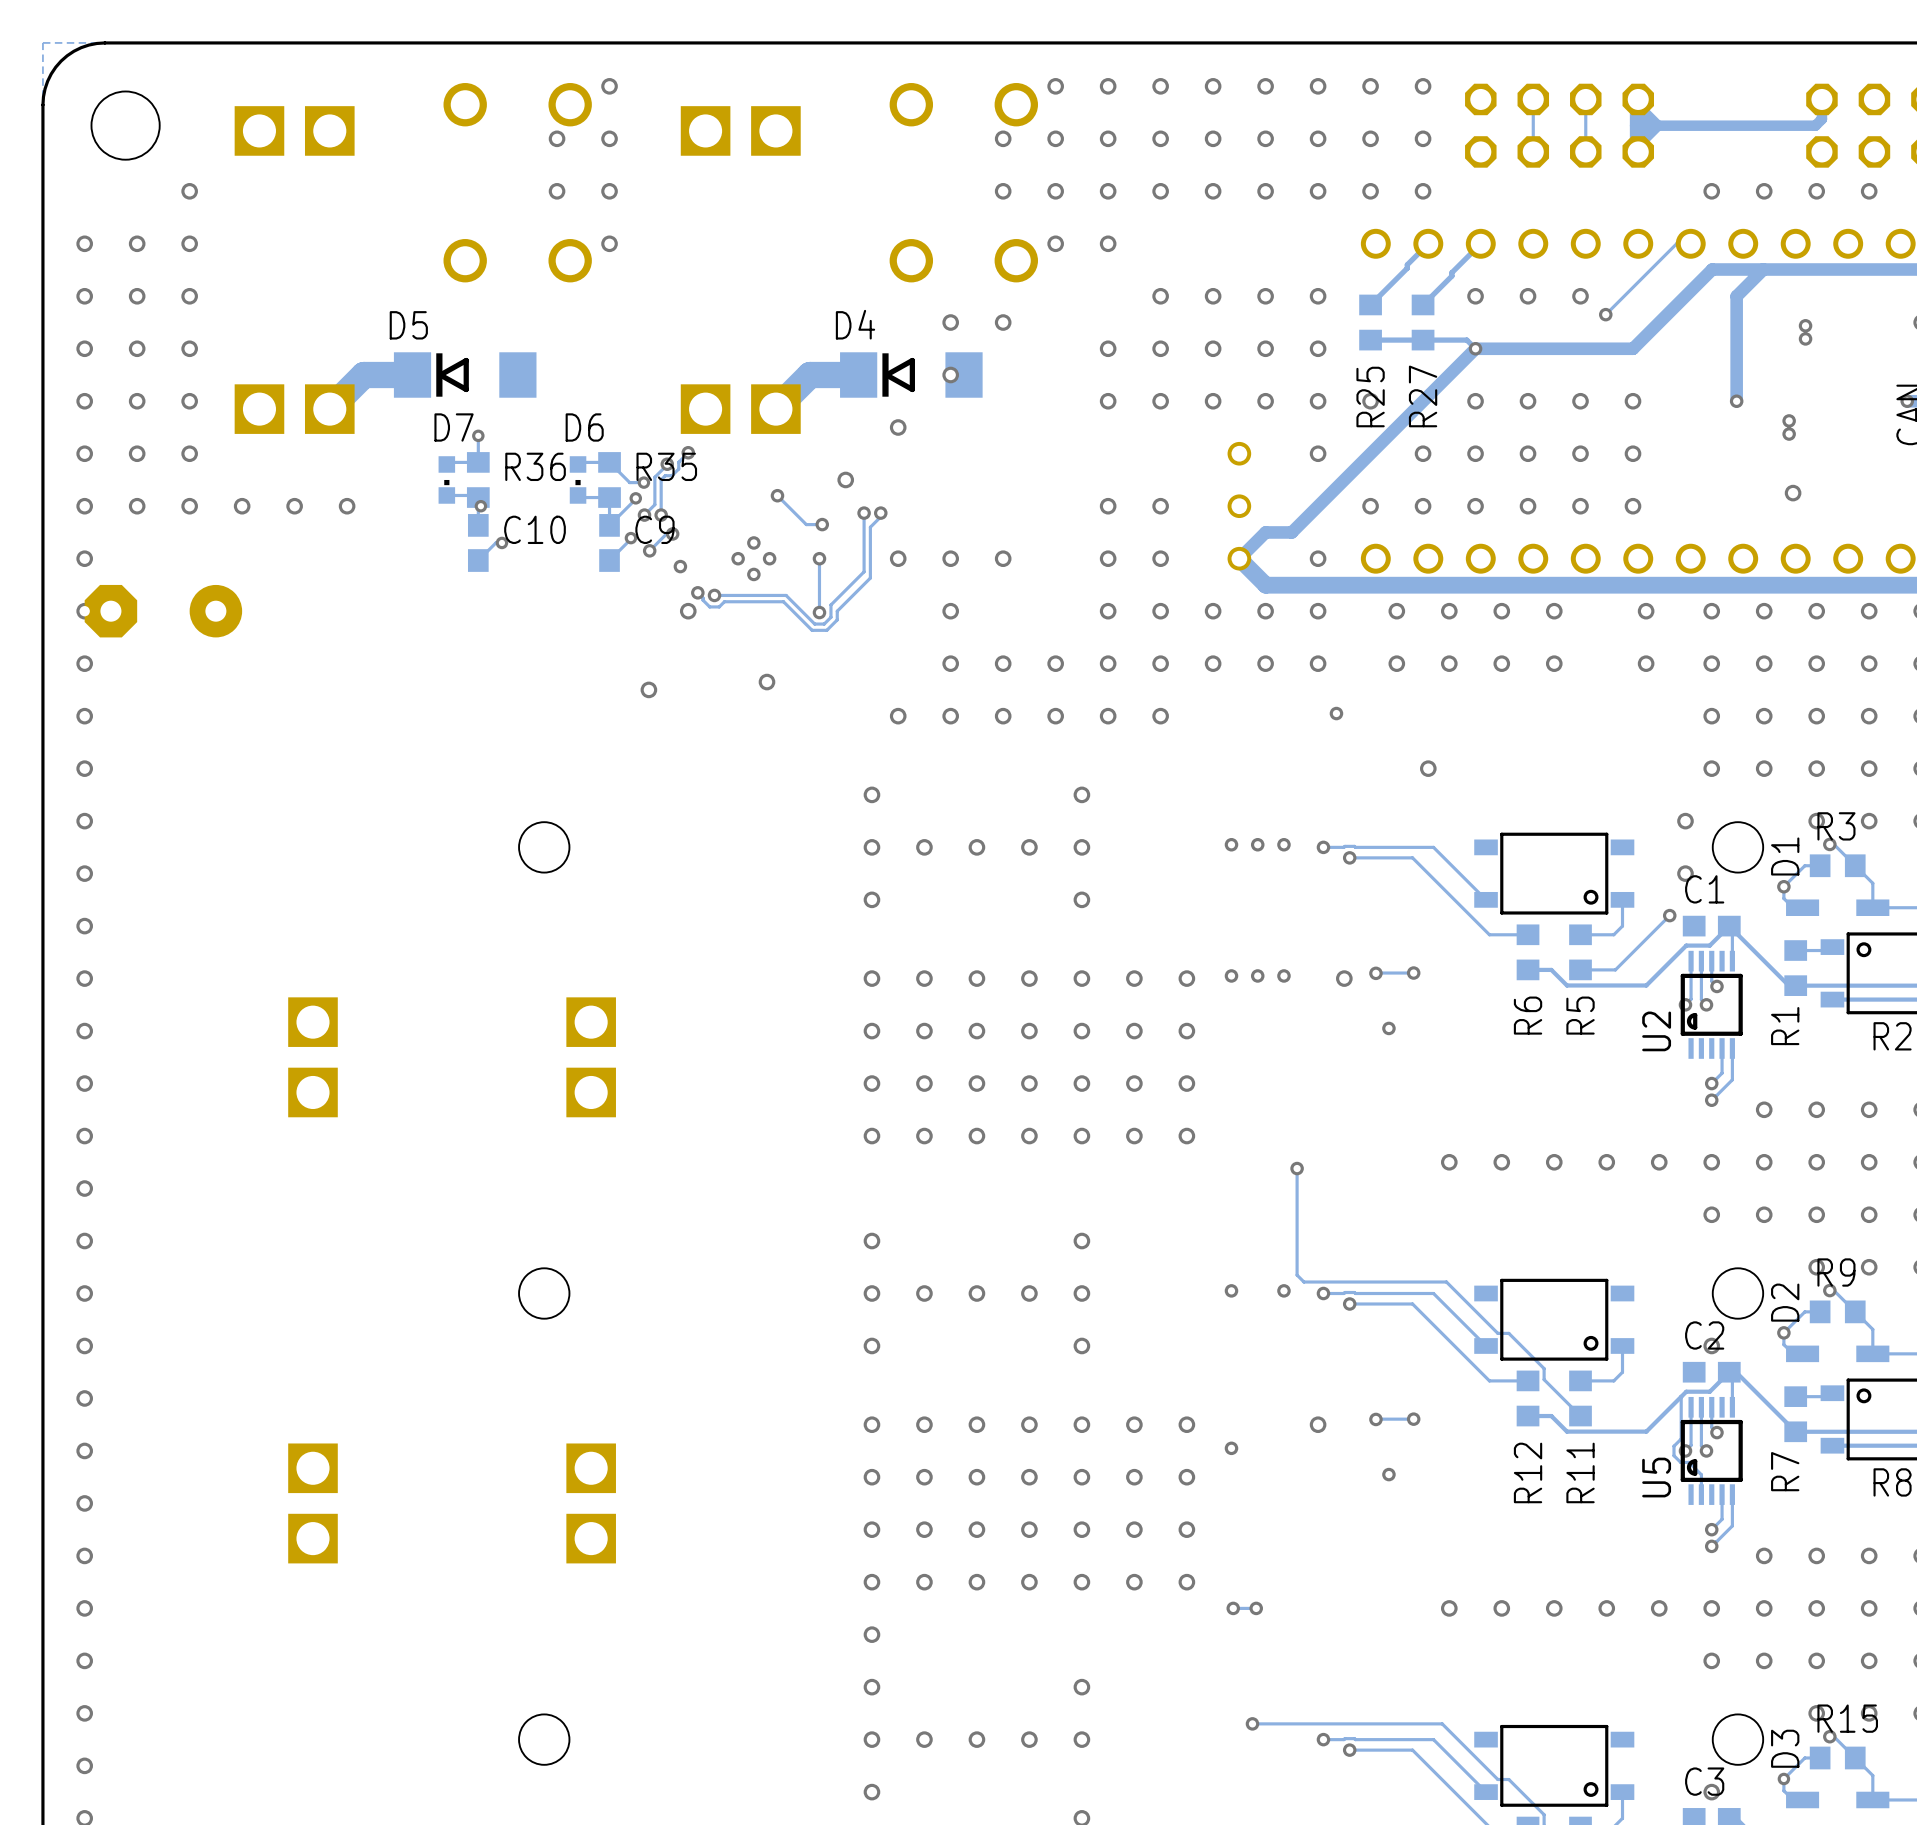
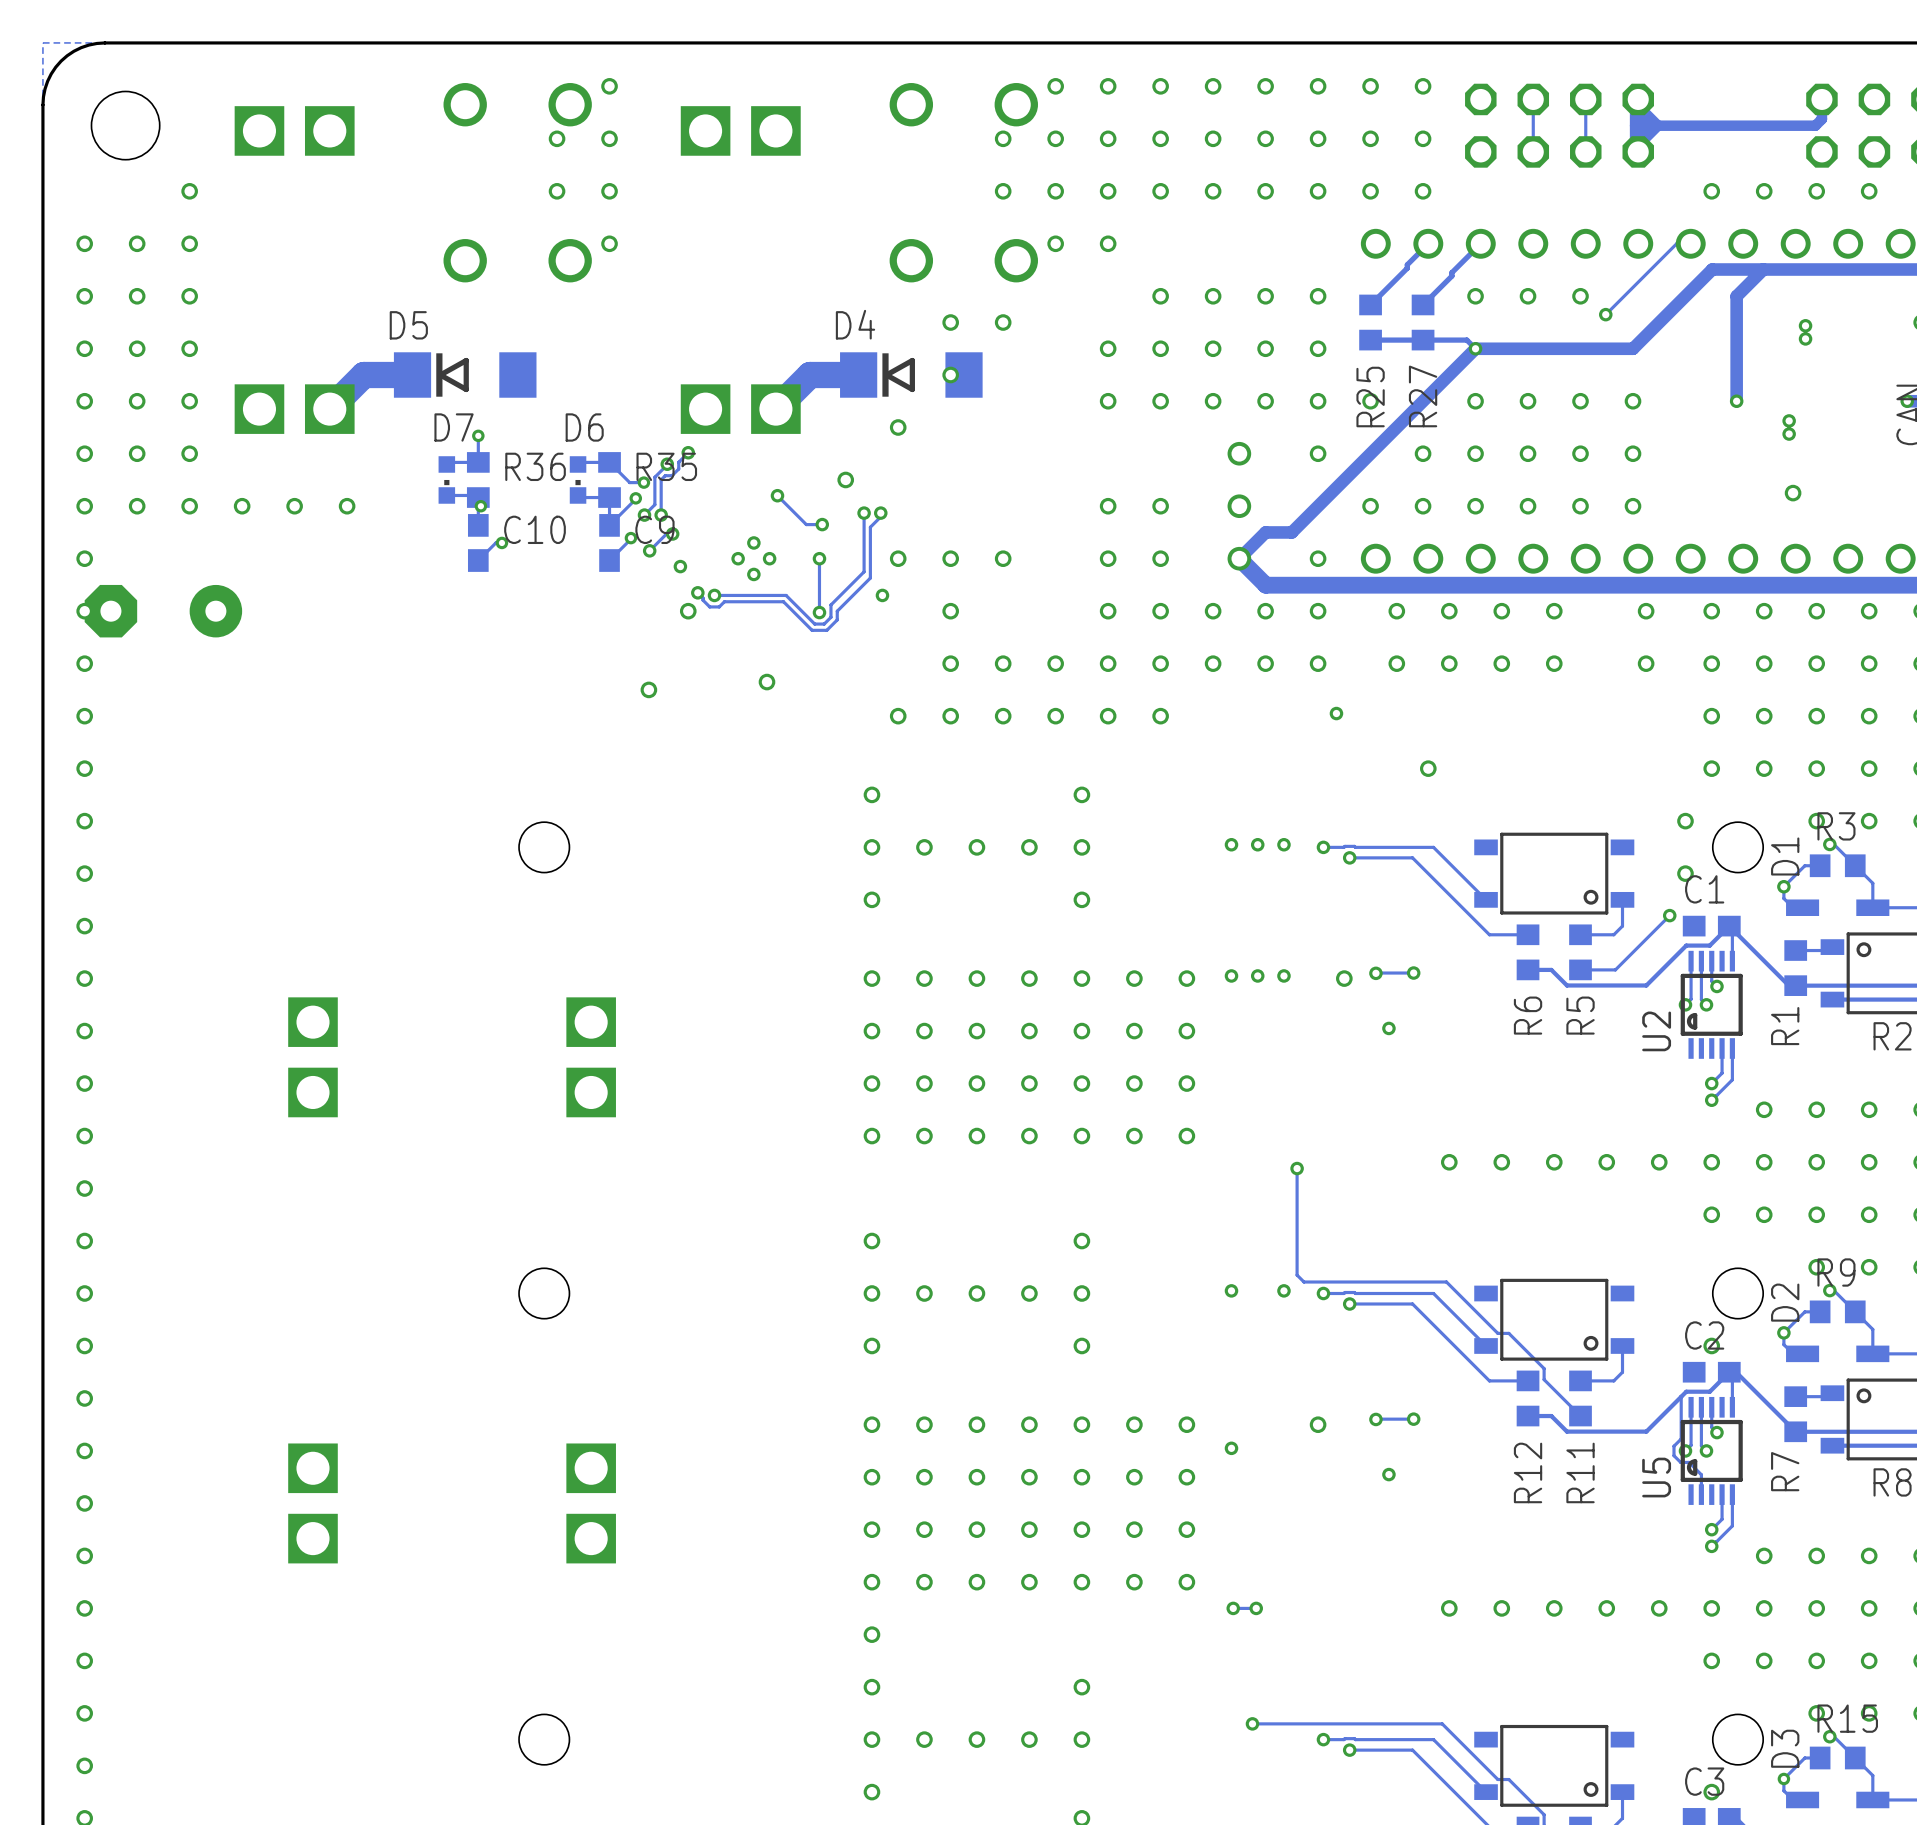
via: none -> (882, 595)

